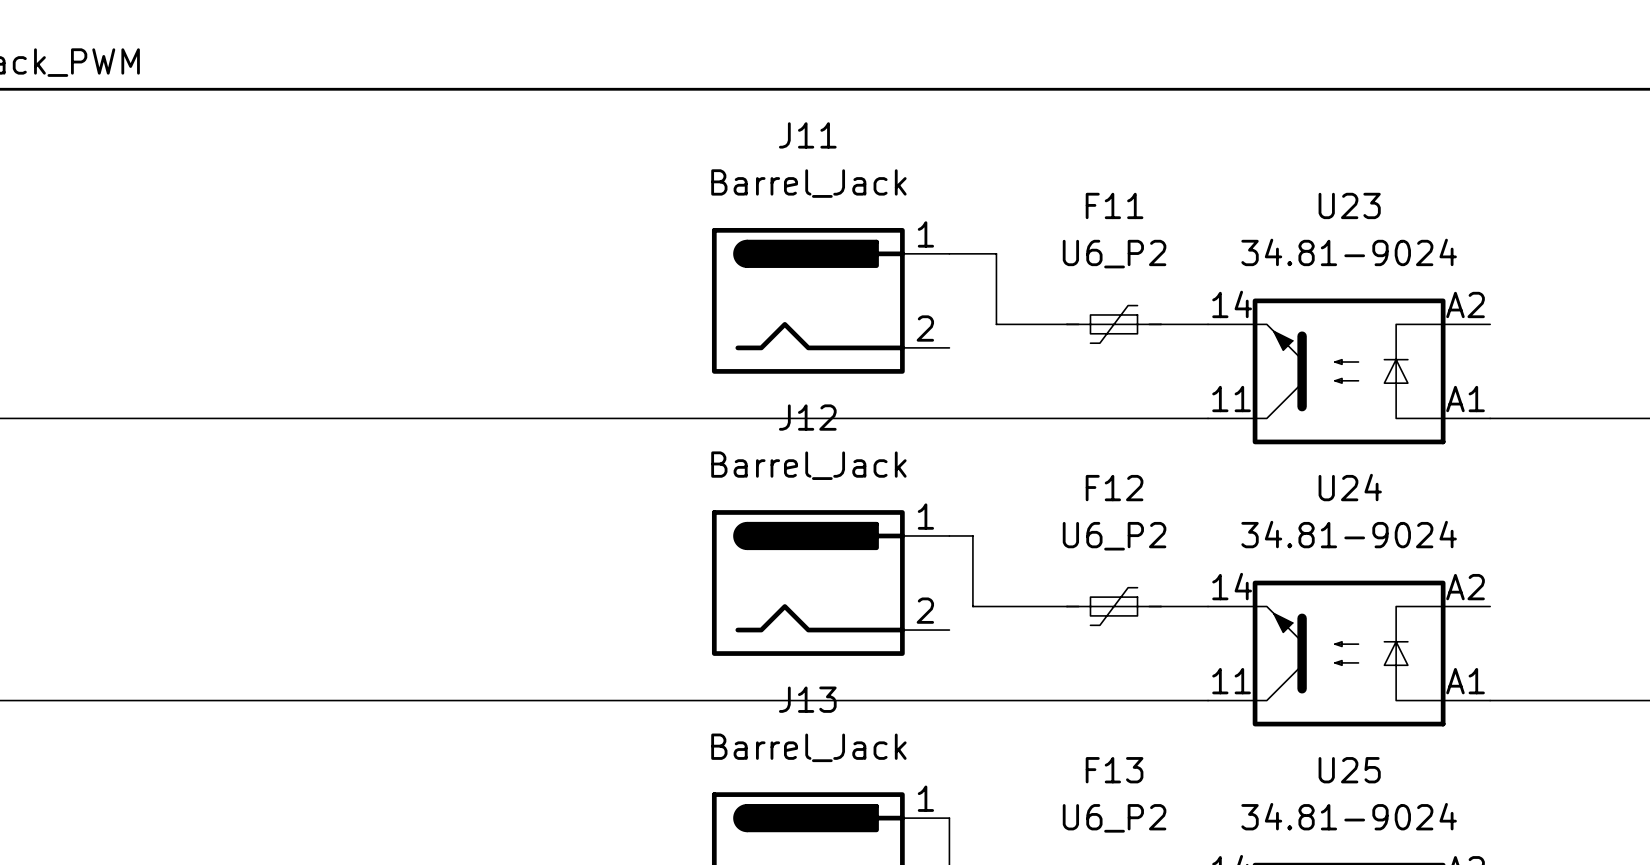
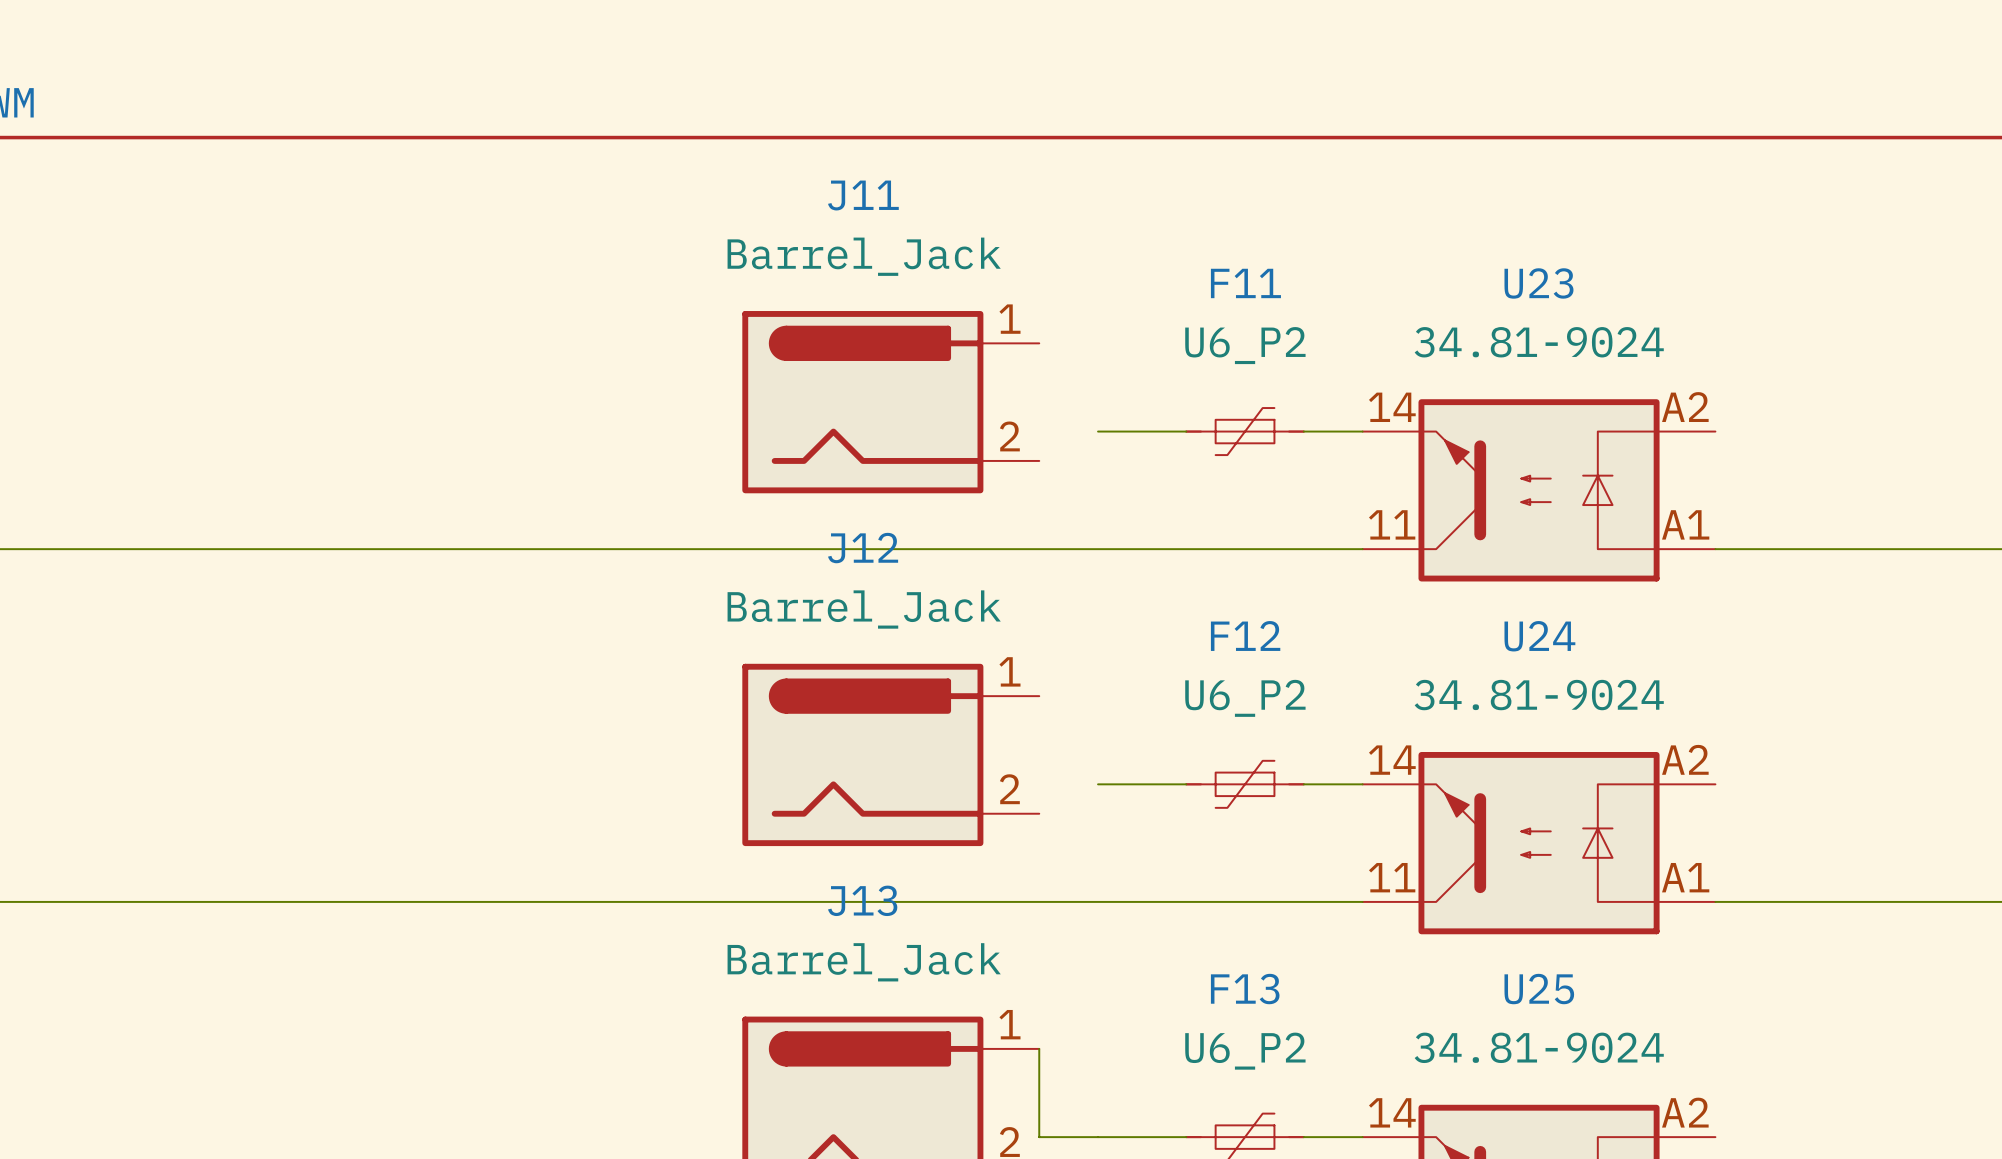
wire: (949, 253) (996, 253) (996, 324) -> none
wire: (949, 535) (972, 535) (972, 606) (996, 606) -> none

